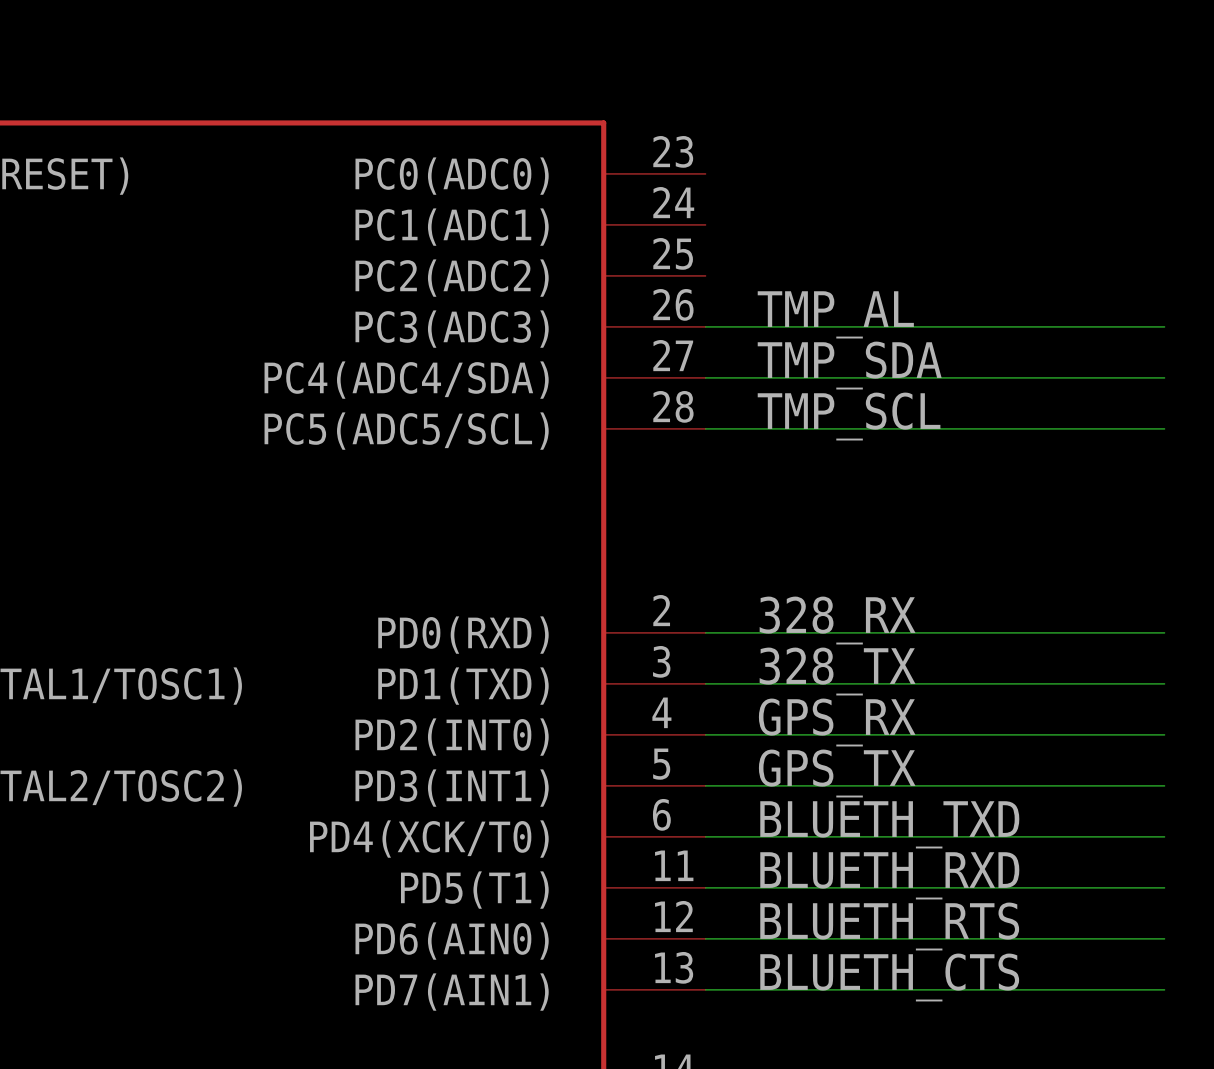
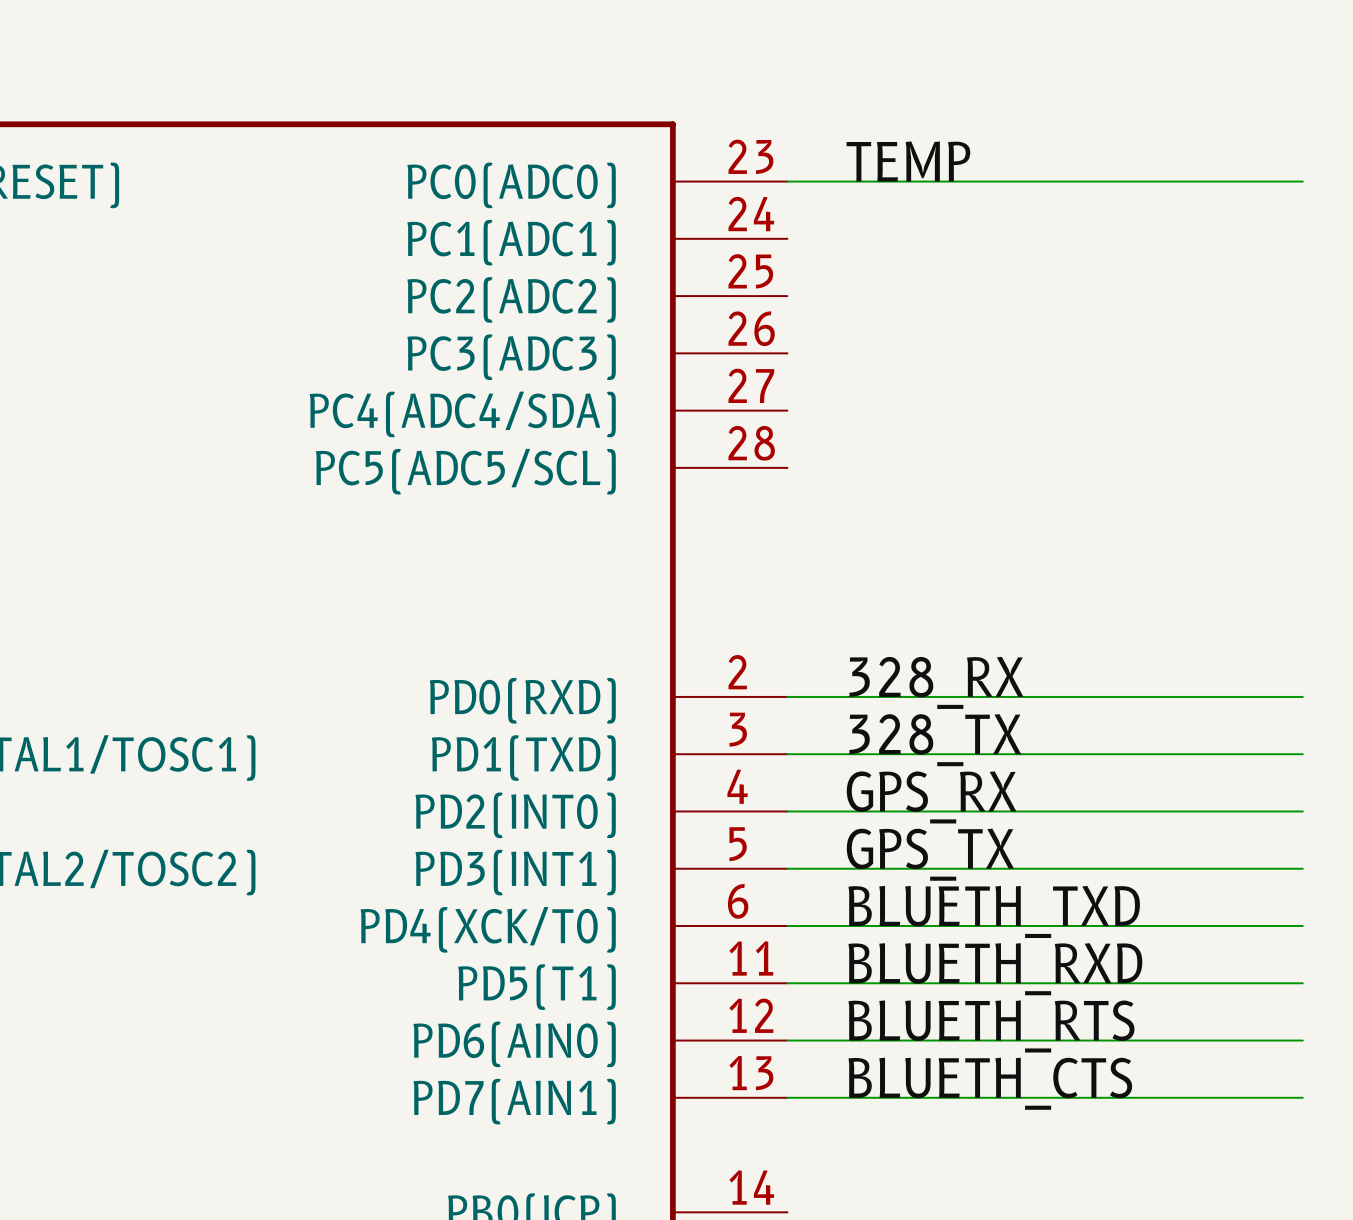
label: none -> TEMP (908, 161)
label: TMP_AL (835, 314) -> none
wire: (705, 326) (1164, 326) -> (787, 181) (1302, 181)
label: TMP_SDA (849, 365) -> none
wire: (705, 377) (1164, 377) -> none
label: TMP_SCL (849, 416) -> none
wire: (705, 428) (1164, 428) -> none

